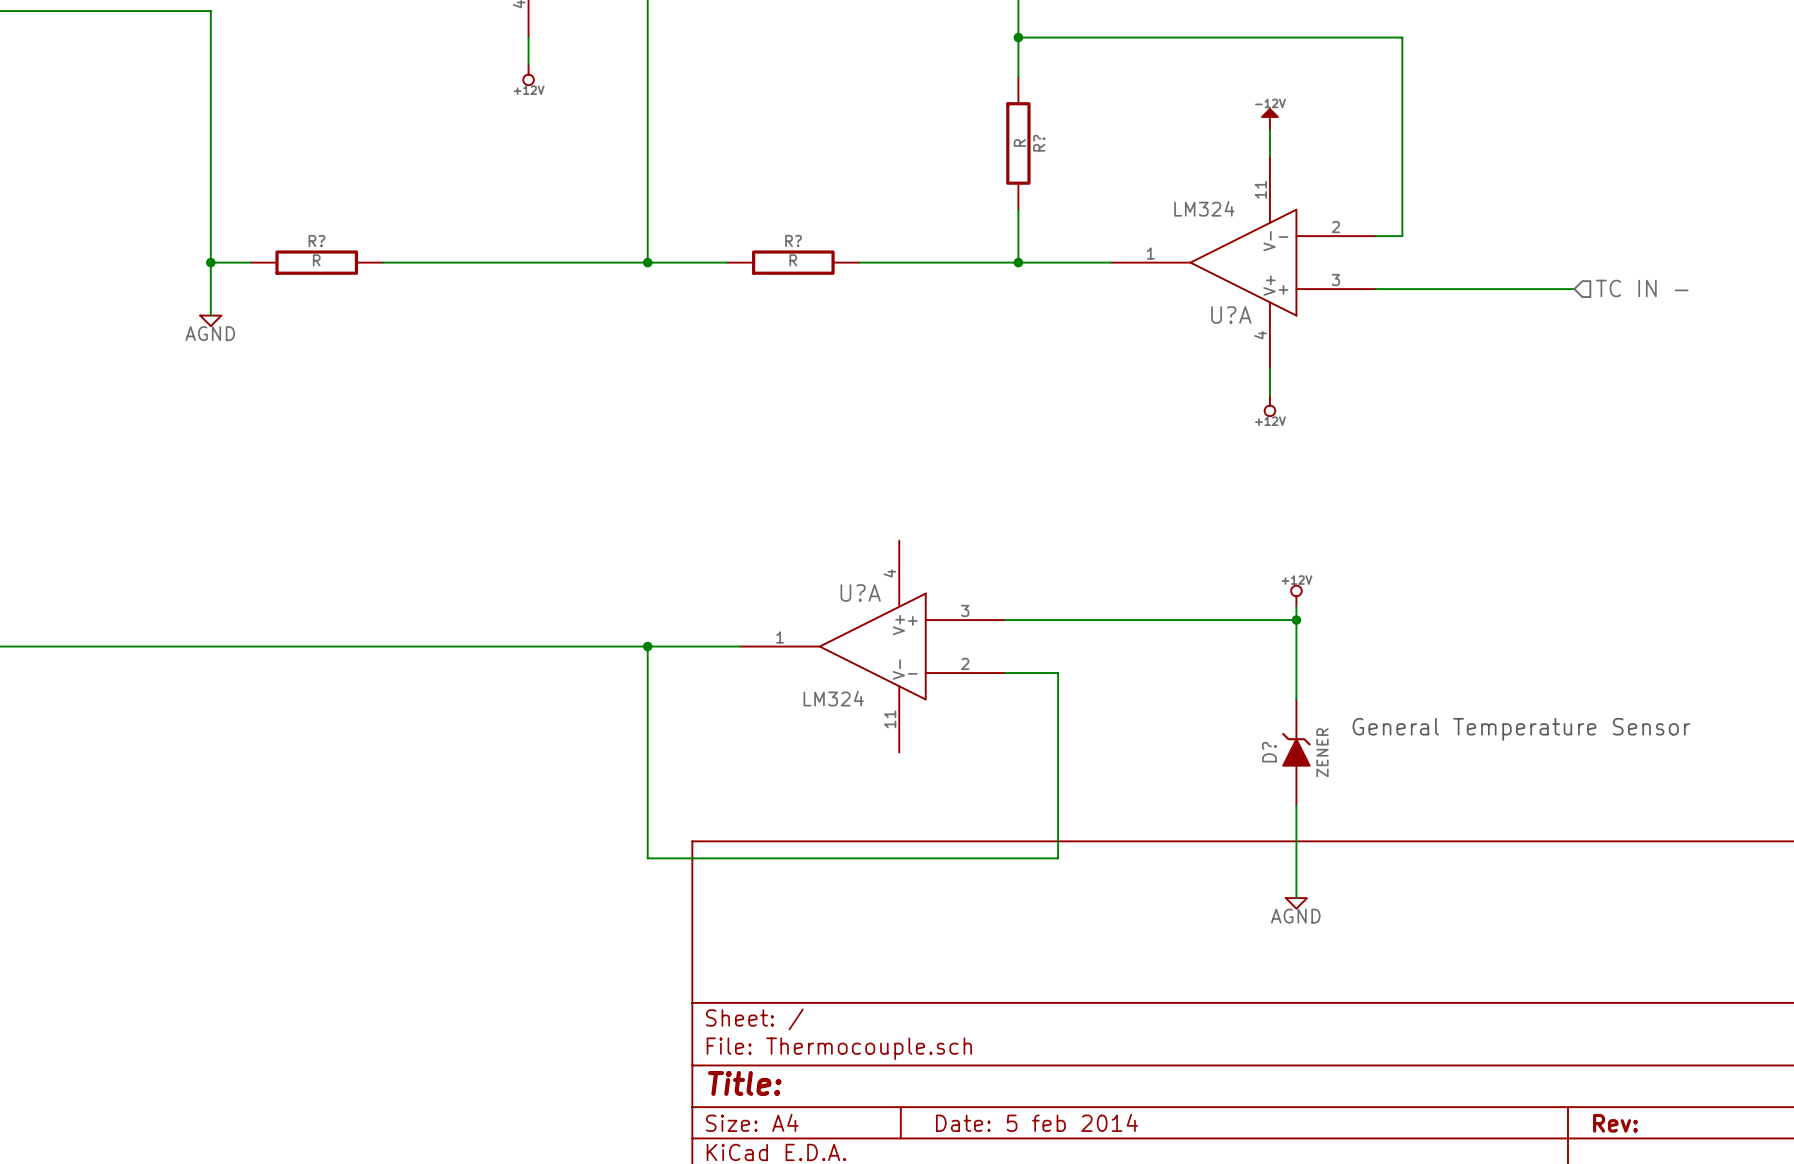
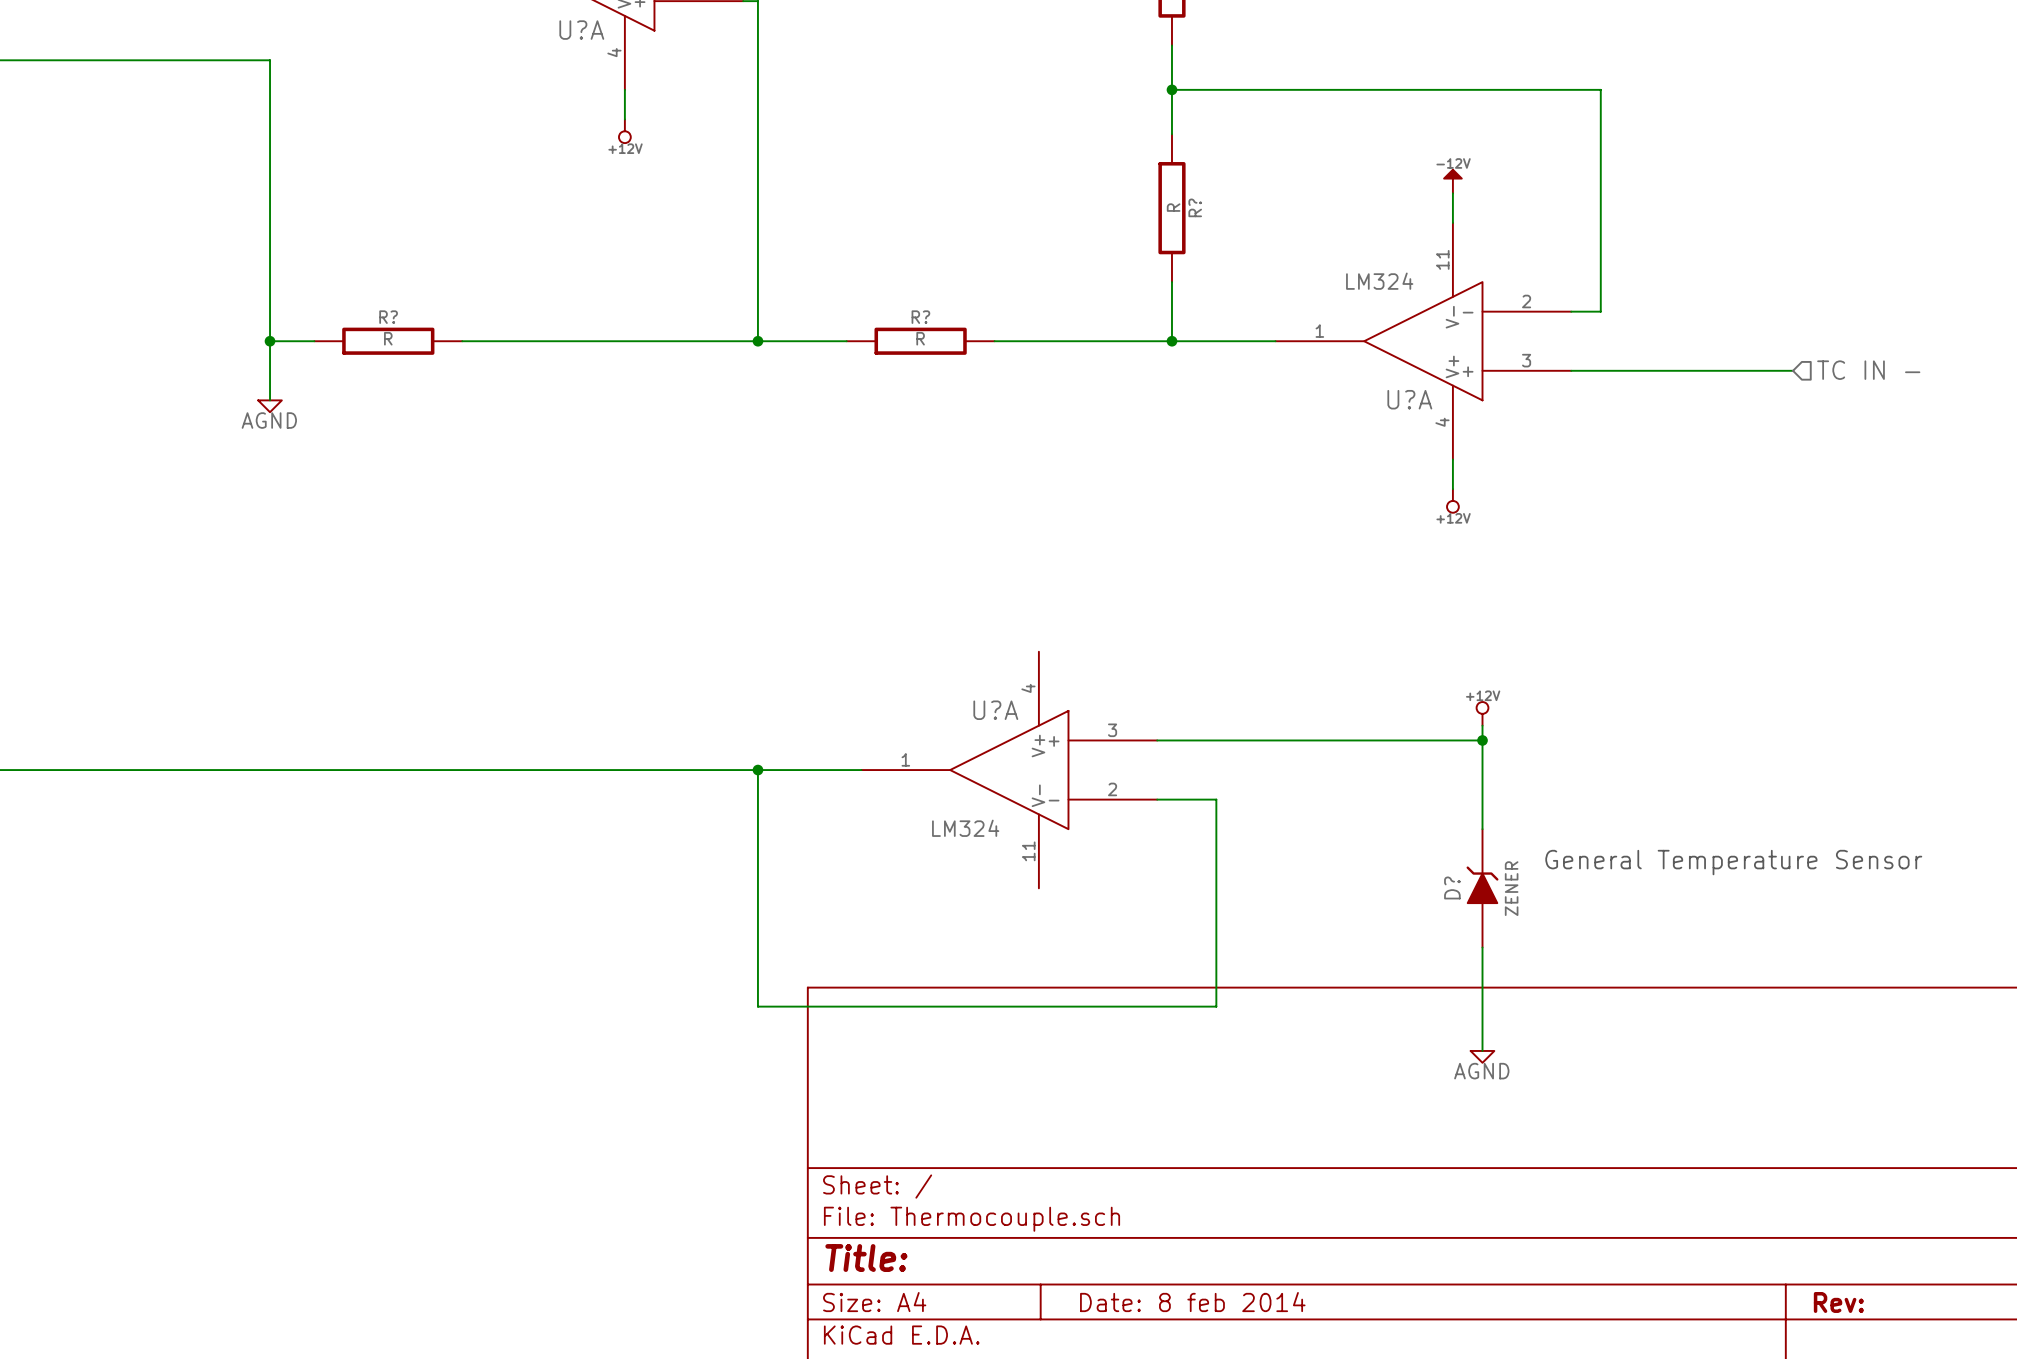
title block: Date: 5 feb 2014 (1037, 1122) -> Date: 8 feb 2014 (1192, 1302)

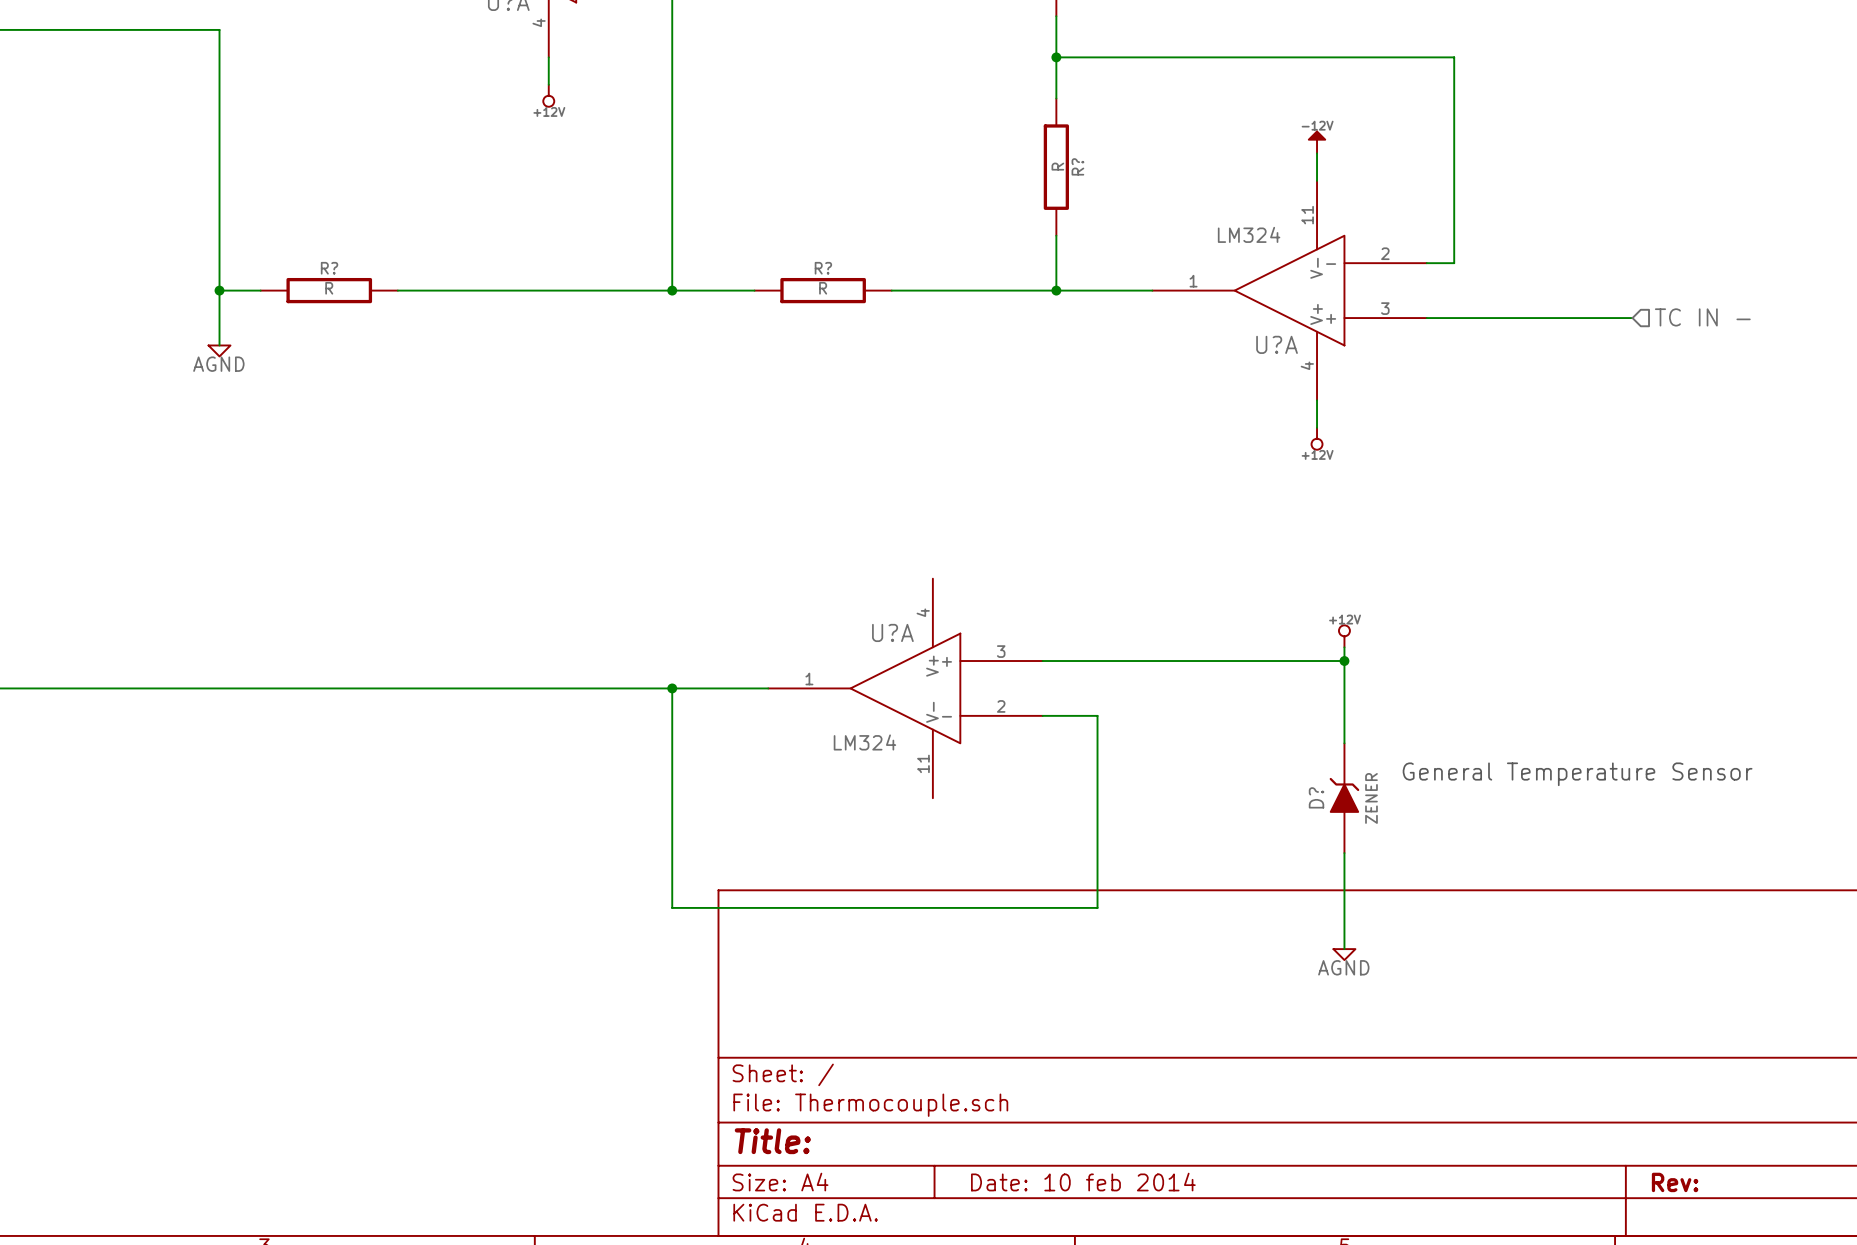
title block: Date: 8 feb 2014 (1192, 1302) -> Date: 10 feb 2014 (1083, 1182)

